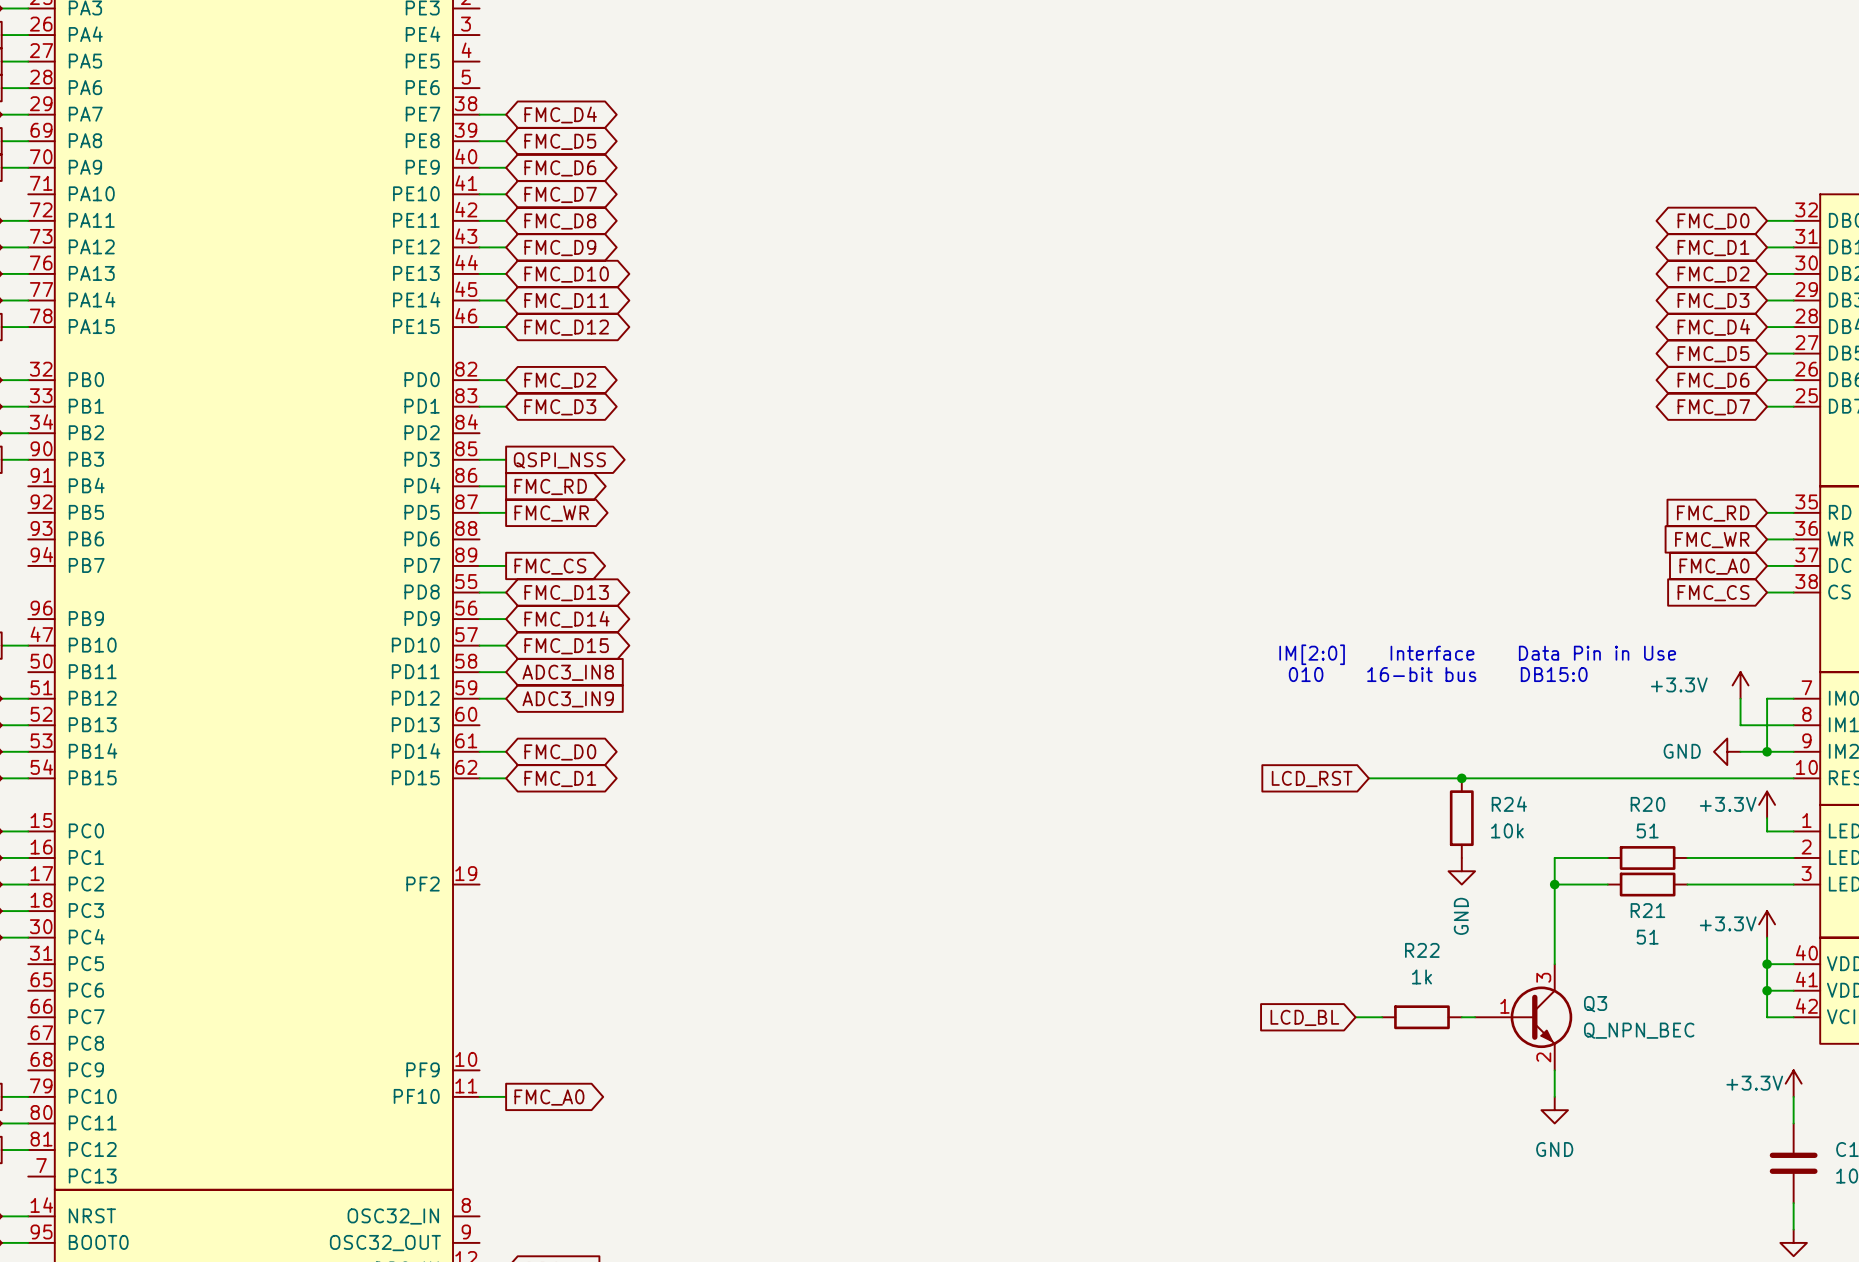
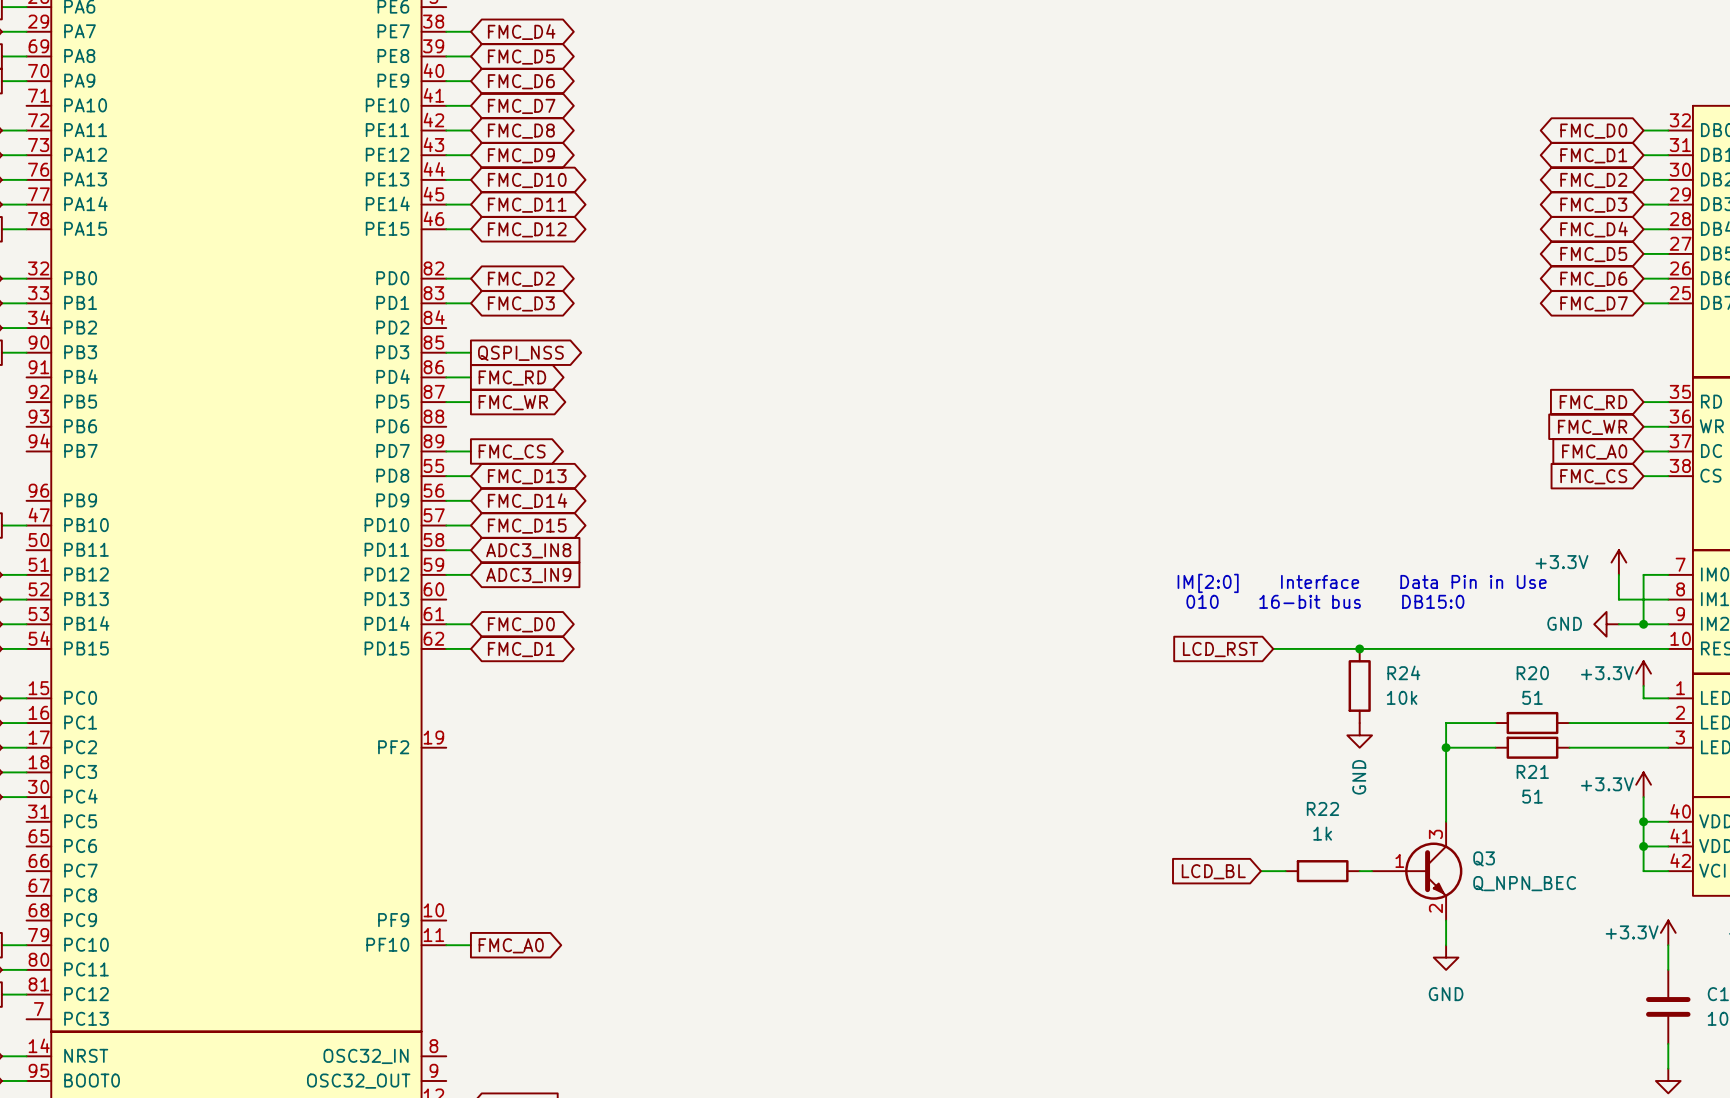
text position: IM[2:0] Interface Data Pin in Use (1477, 654) -> IM[2:0] Interface Data Pin in Use (1362, 583)
text position: 010 16-bit bus DB15:0 (1438, 674) -> 010 16-bit bus DB15:0 (1325, 601)

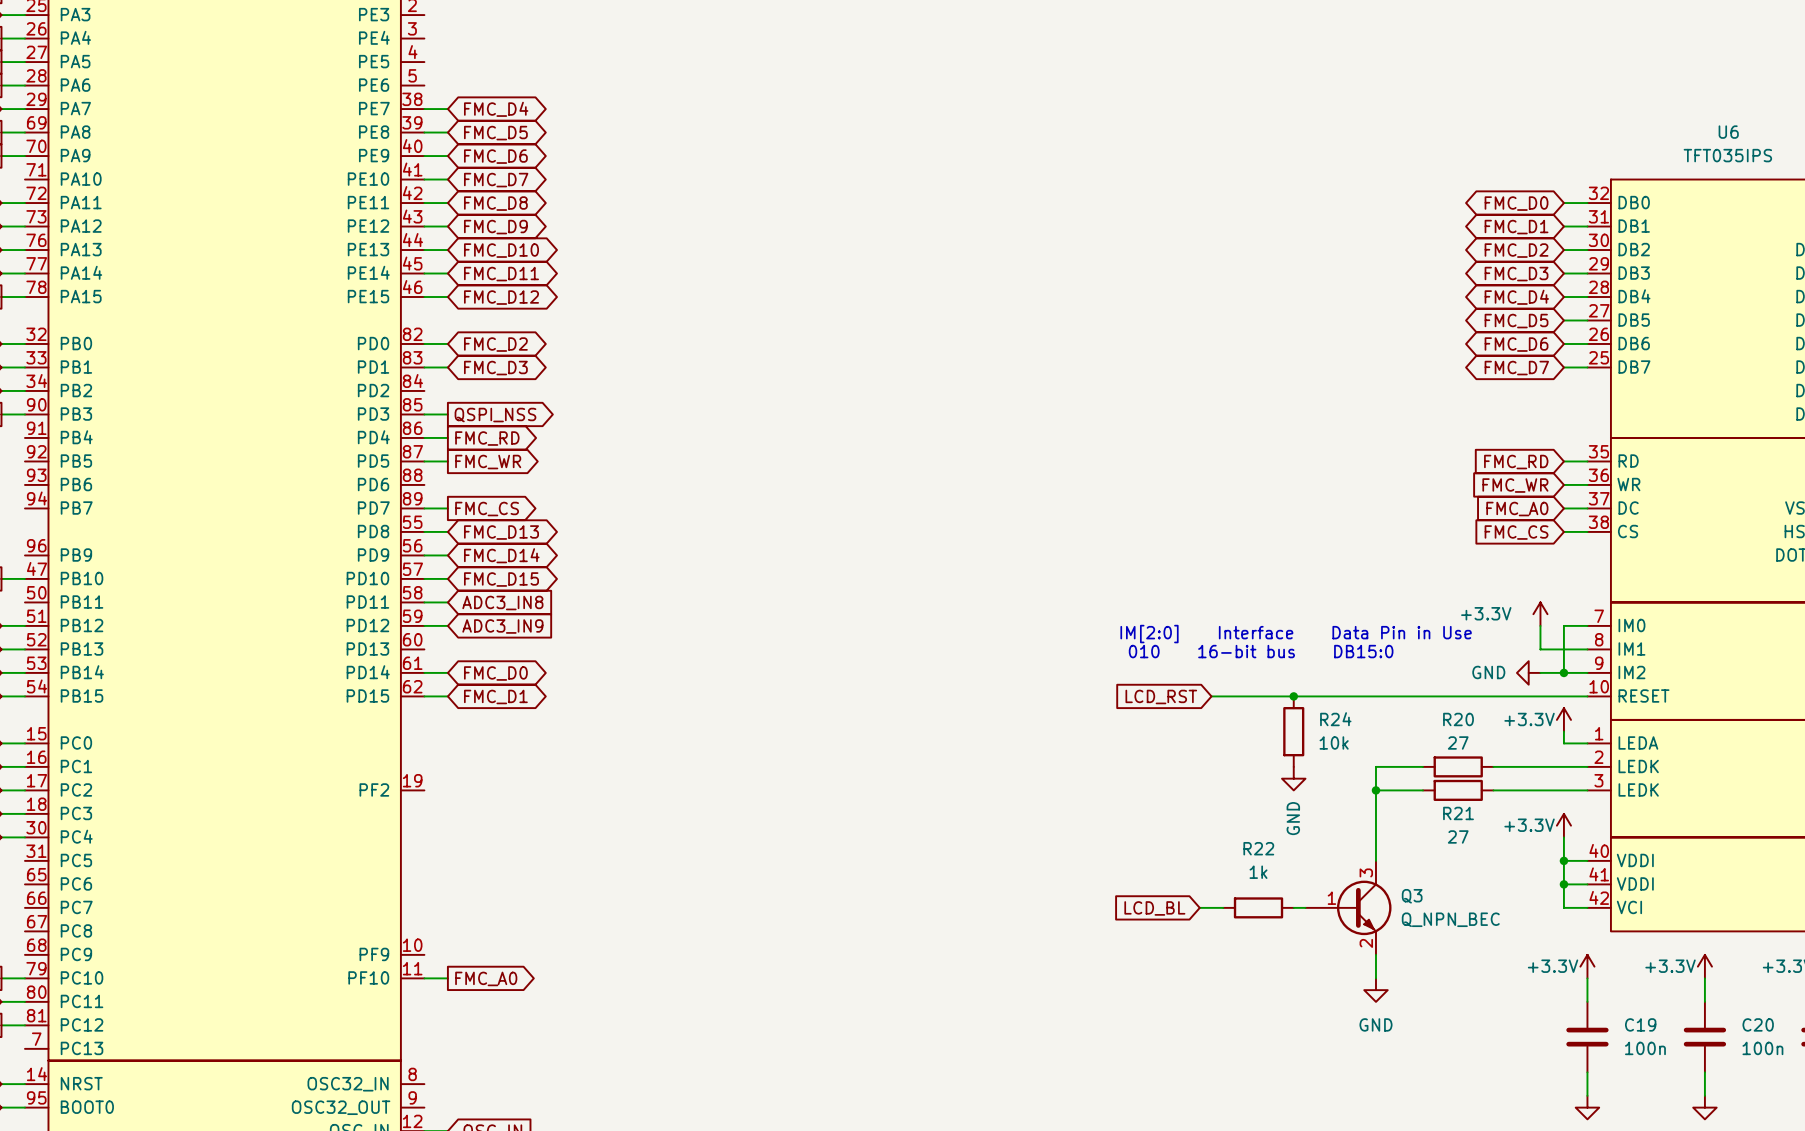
R20 value: 51 (1532, 697) -> 27 (1458, 742)
R21 value: 51 (1532, 796) -> 27 (1458, 836)

